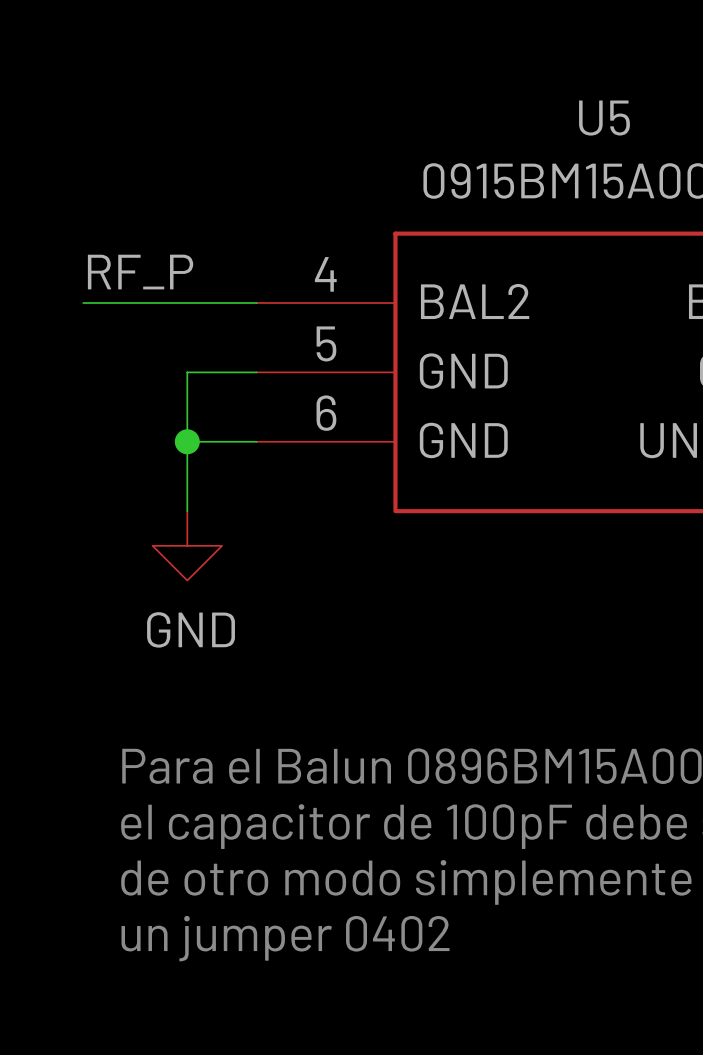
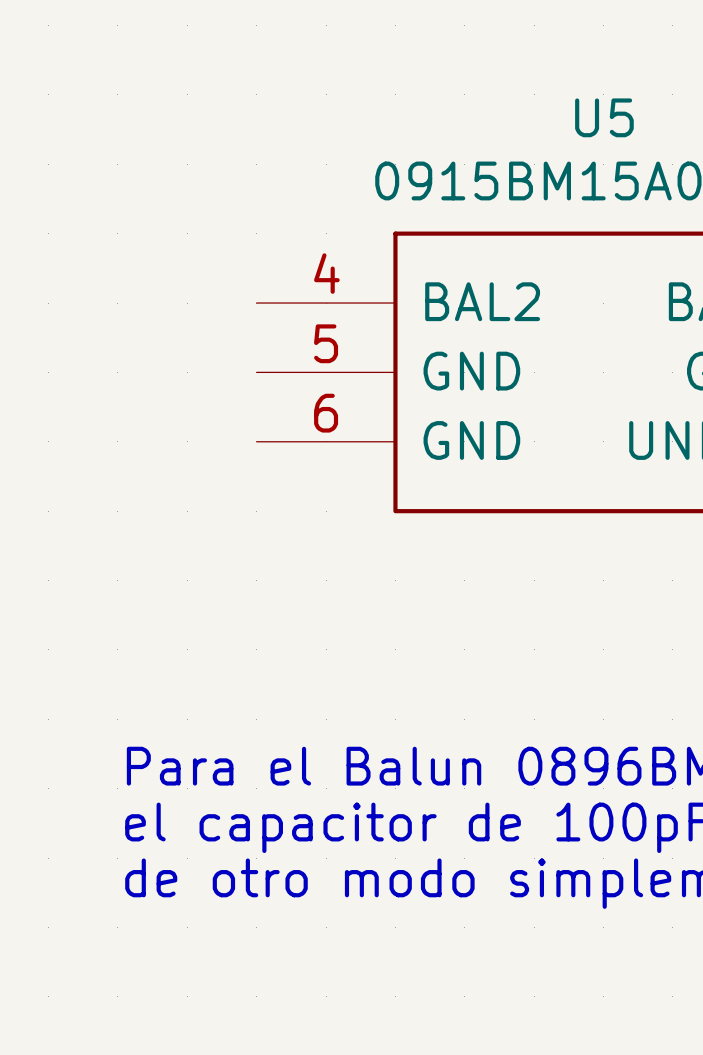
label: RF_P (140, 272) -> none
wire: (83, 303) (256, 303) -> none
wire: (256, 372) (187, 372) (187, 511) -> none
wire: (187, 441) (256, 441) -> none
junction: (187, 441) -> none
power symbol: GND (187, 545) -> none
text: un jumper 0402 (285, 938) -> none

